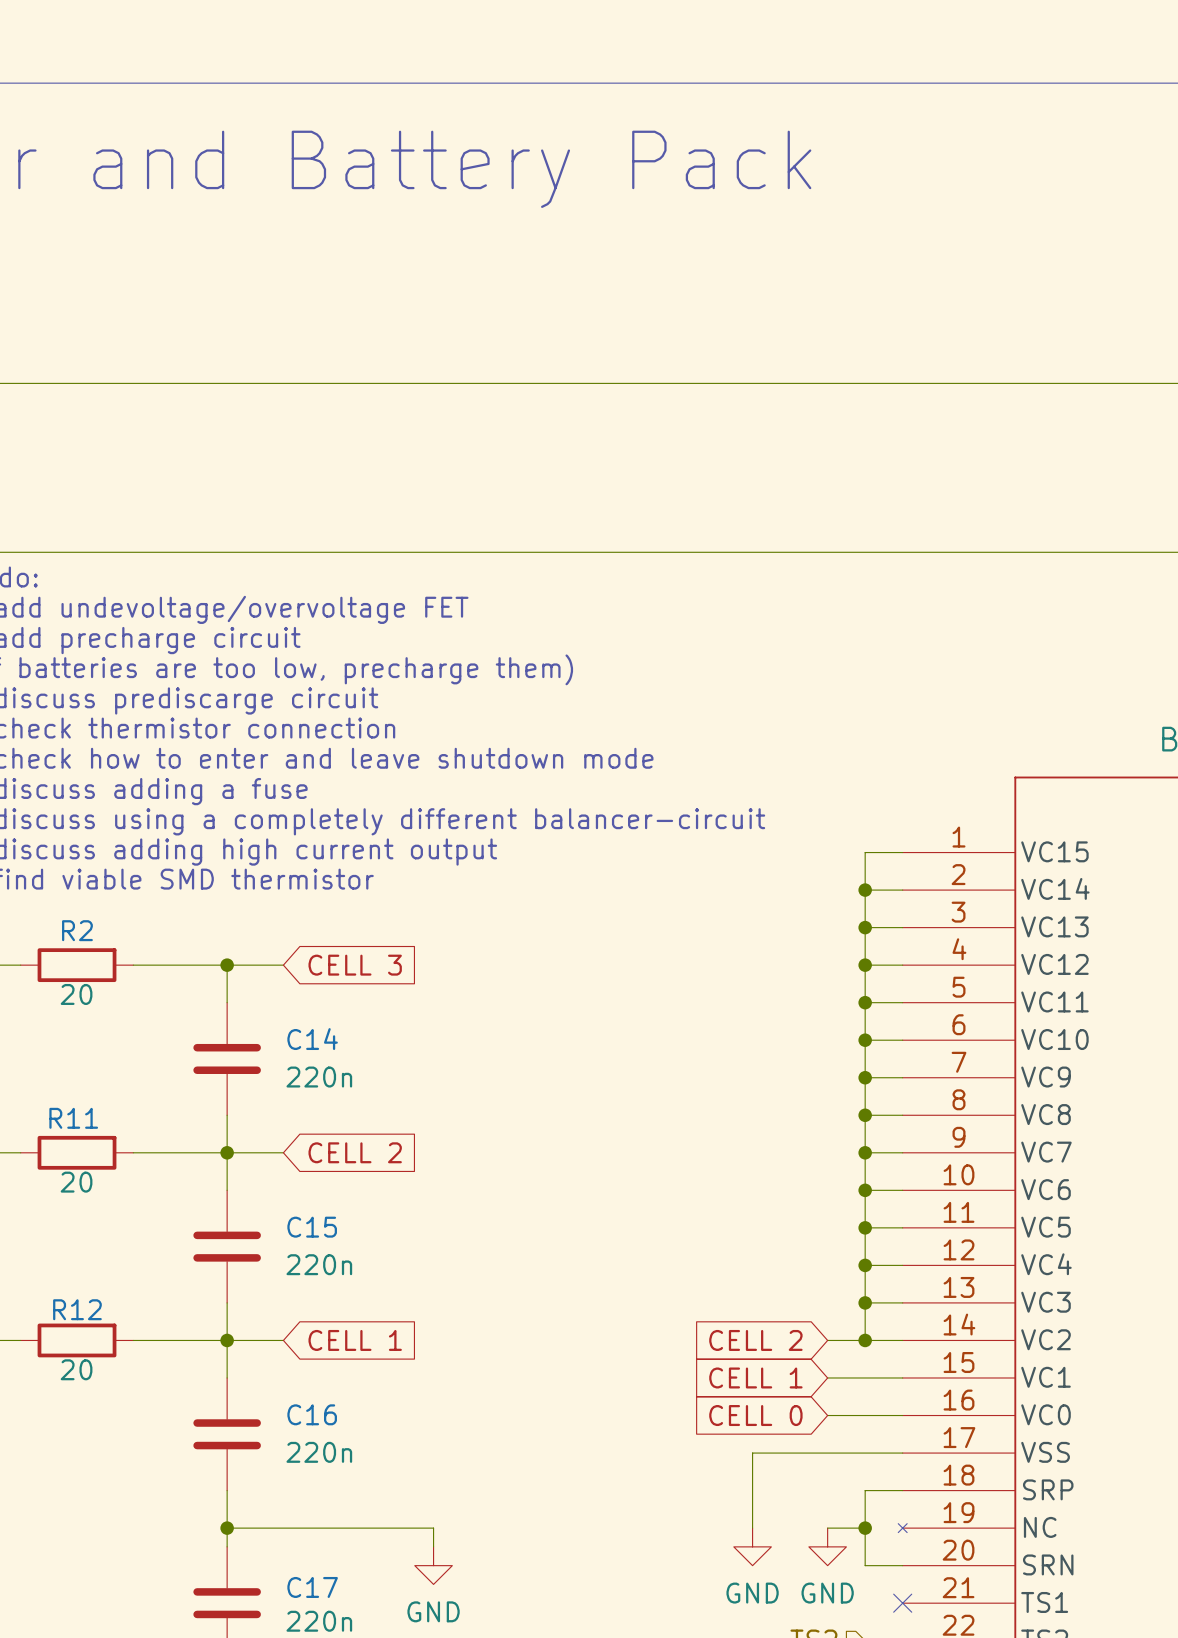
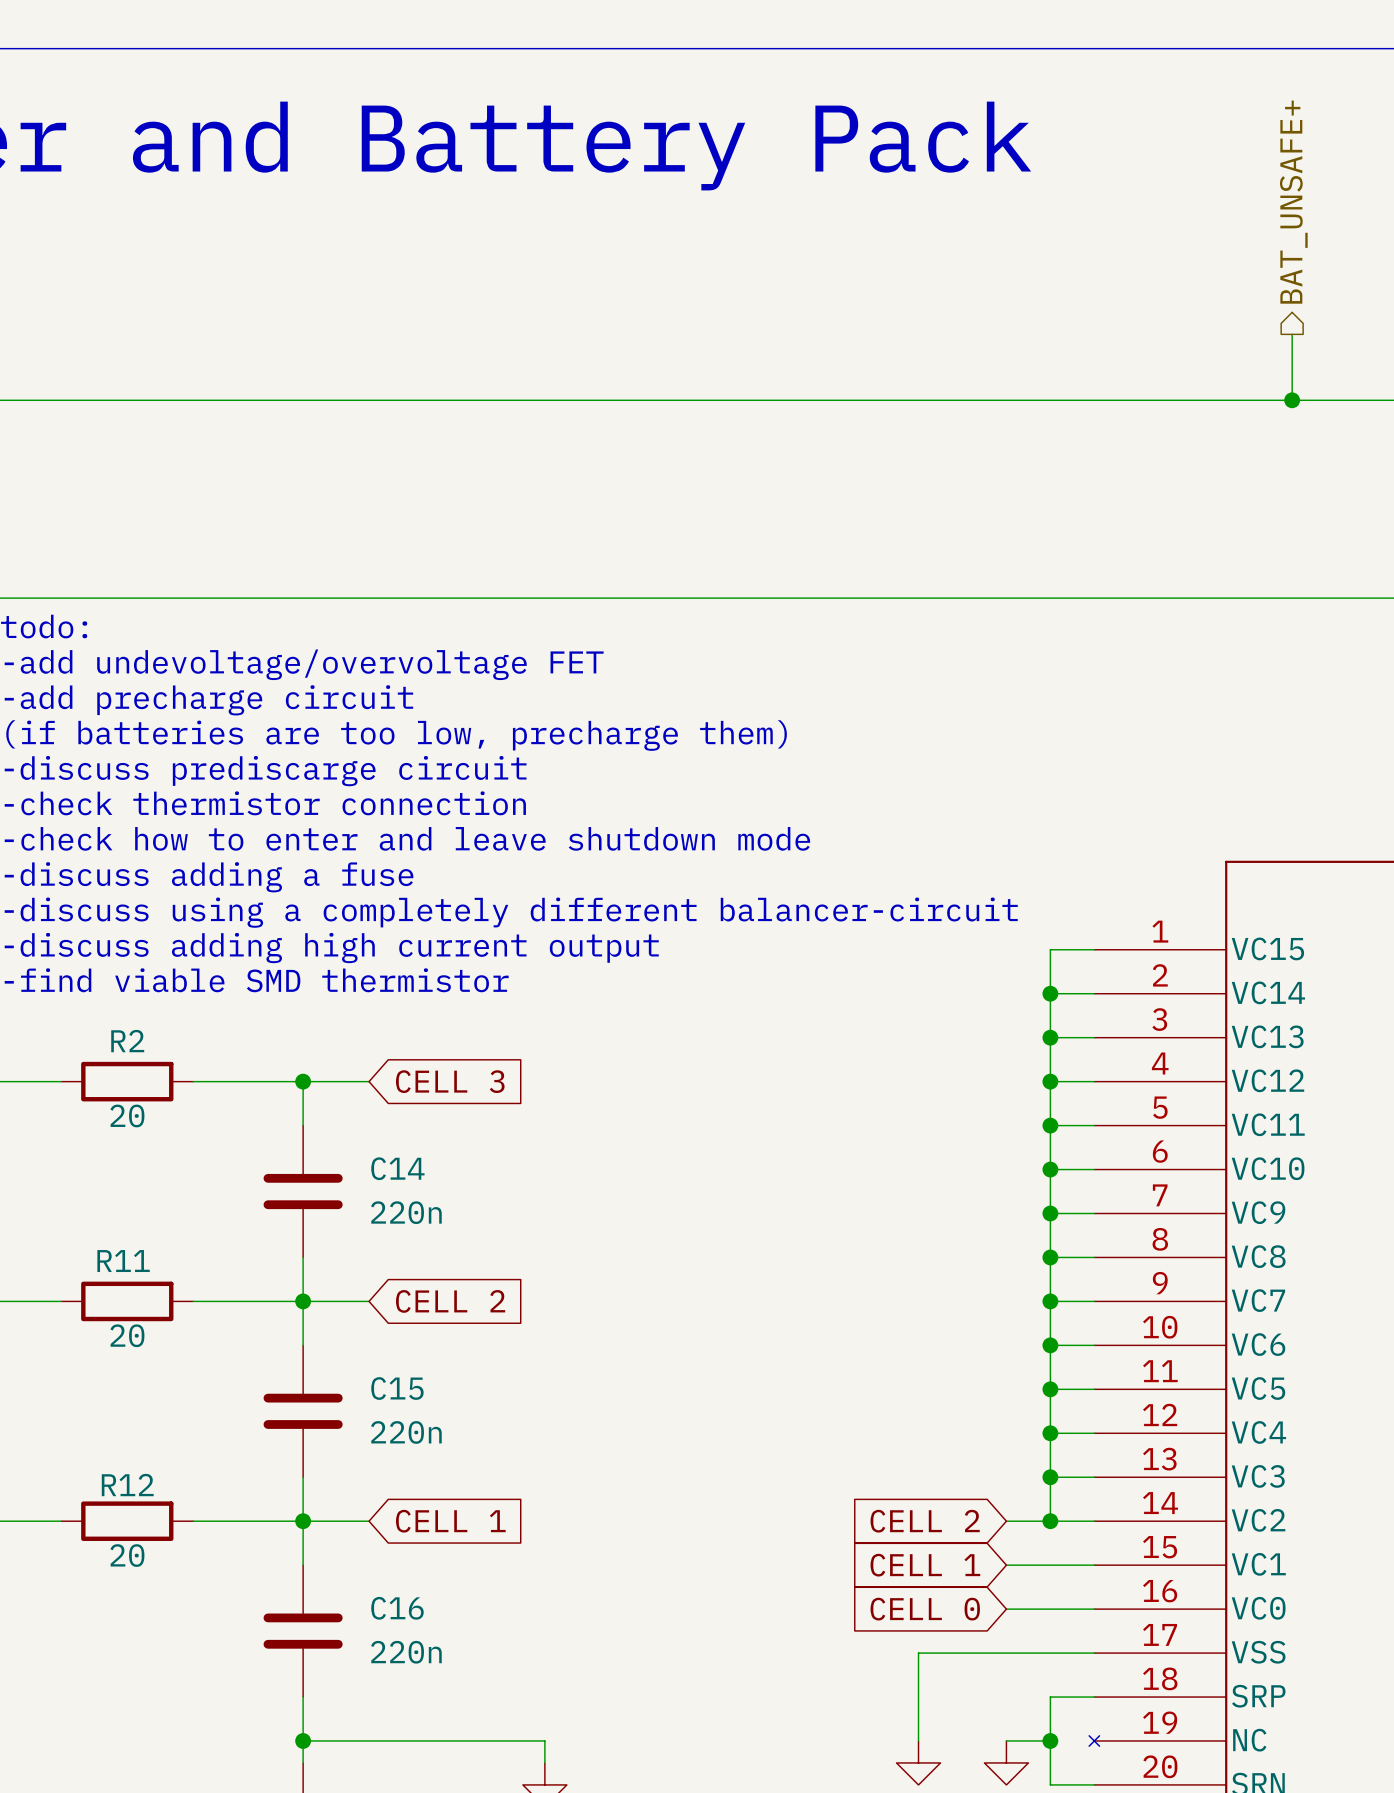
hierarchical label: none -> BAT_UNSAFE+ (1293, 202)
wire: none -> (1292, 334) (1292, 400)
junction: none -> (1292, 400)

